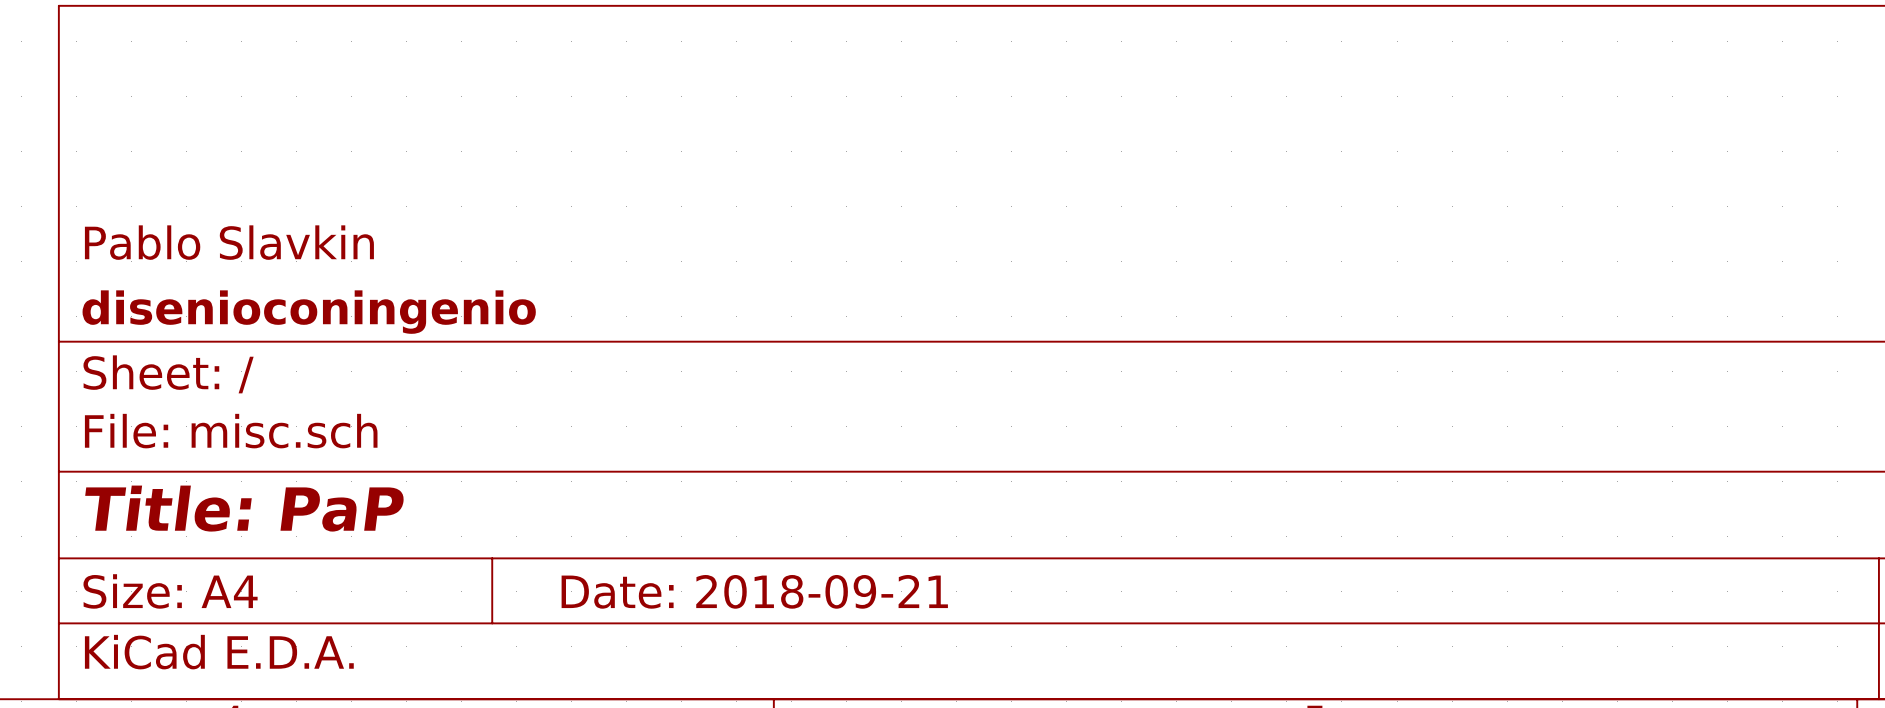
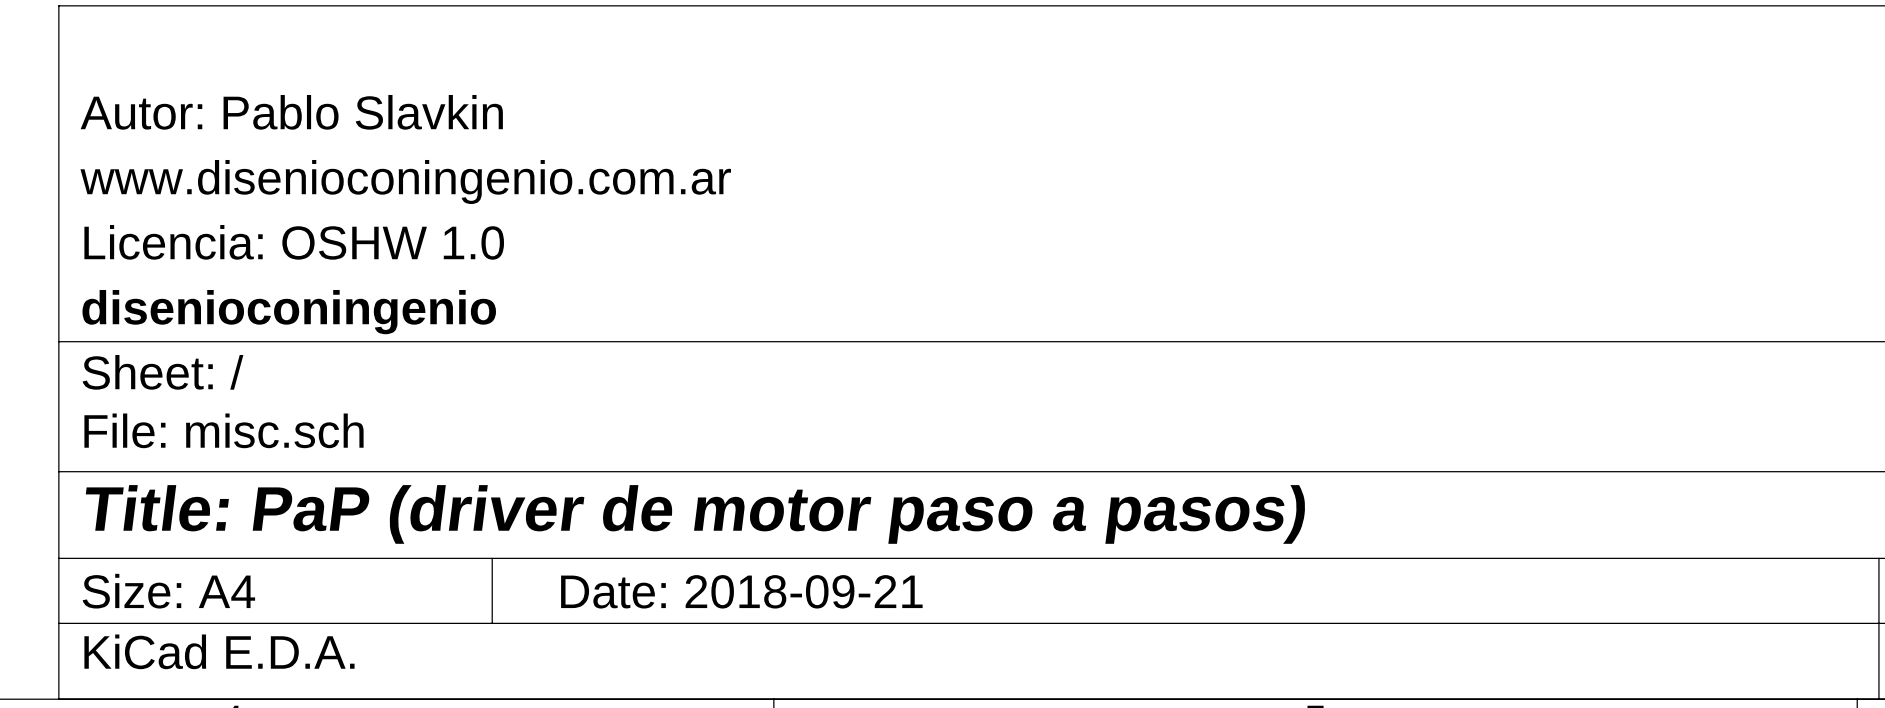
title block: none -> Autor: Pablo Slavkin (291, 112)
title block: none -> www.disenioconingenio.com.ar (405, 182)
title block: Pablo Slavkin (229, 242) -> Licencia: OSHW 1.0 (294, 242)
title block: Title: PaP (244, 508) -> Title: PaP (driver de motor paso a pasos) (695, 514)

